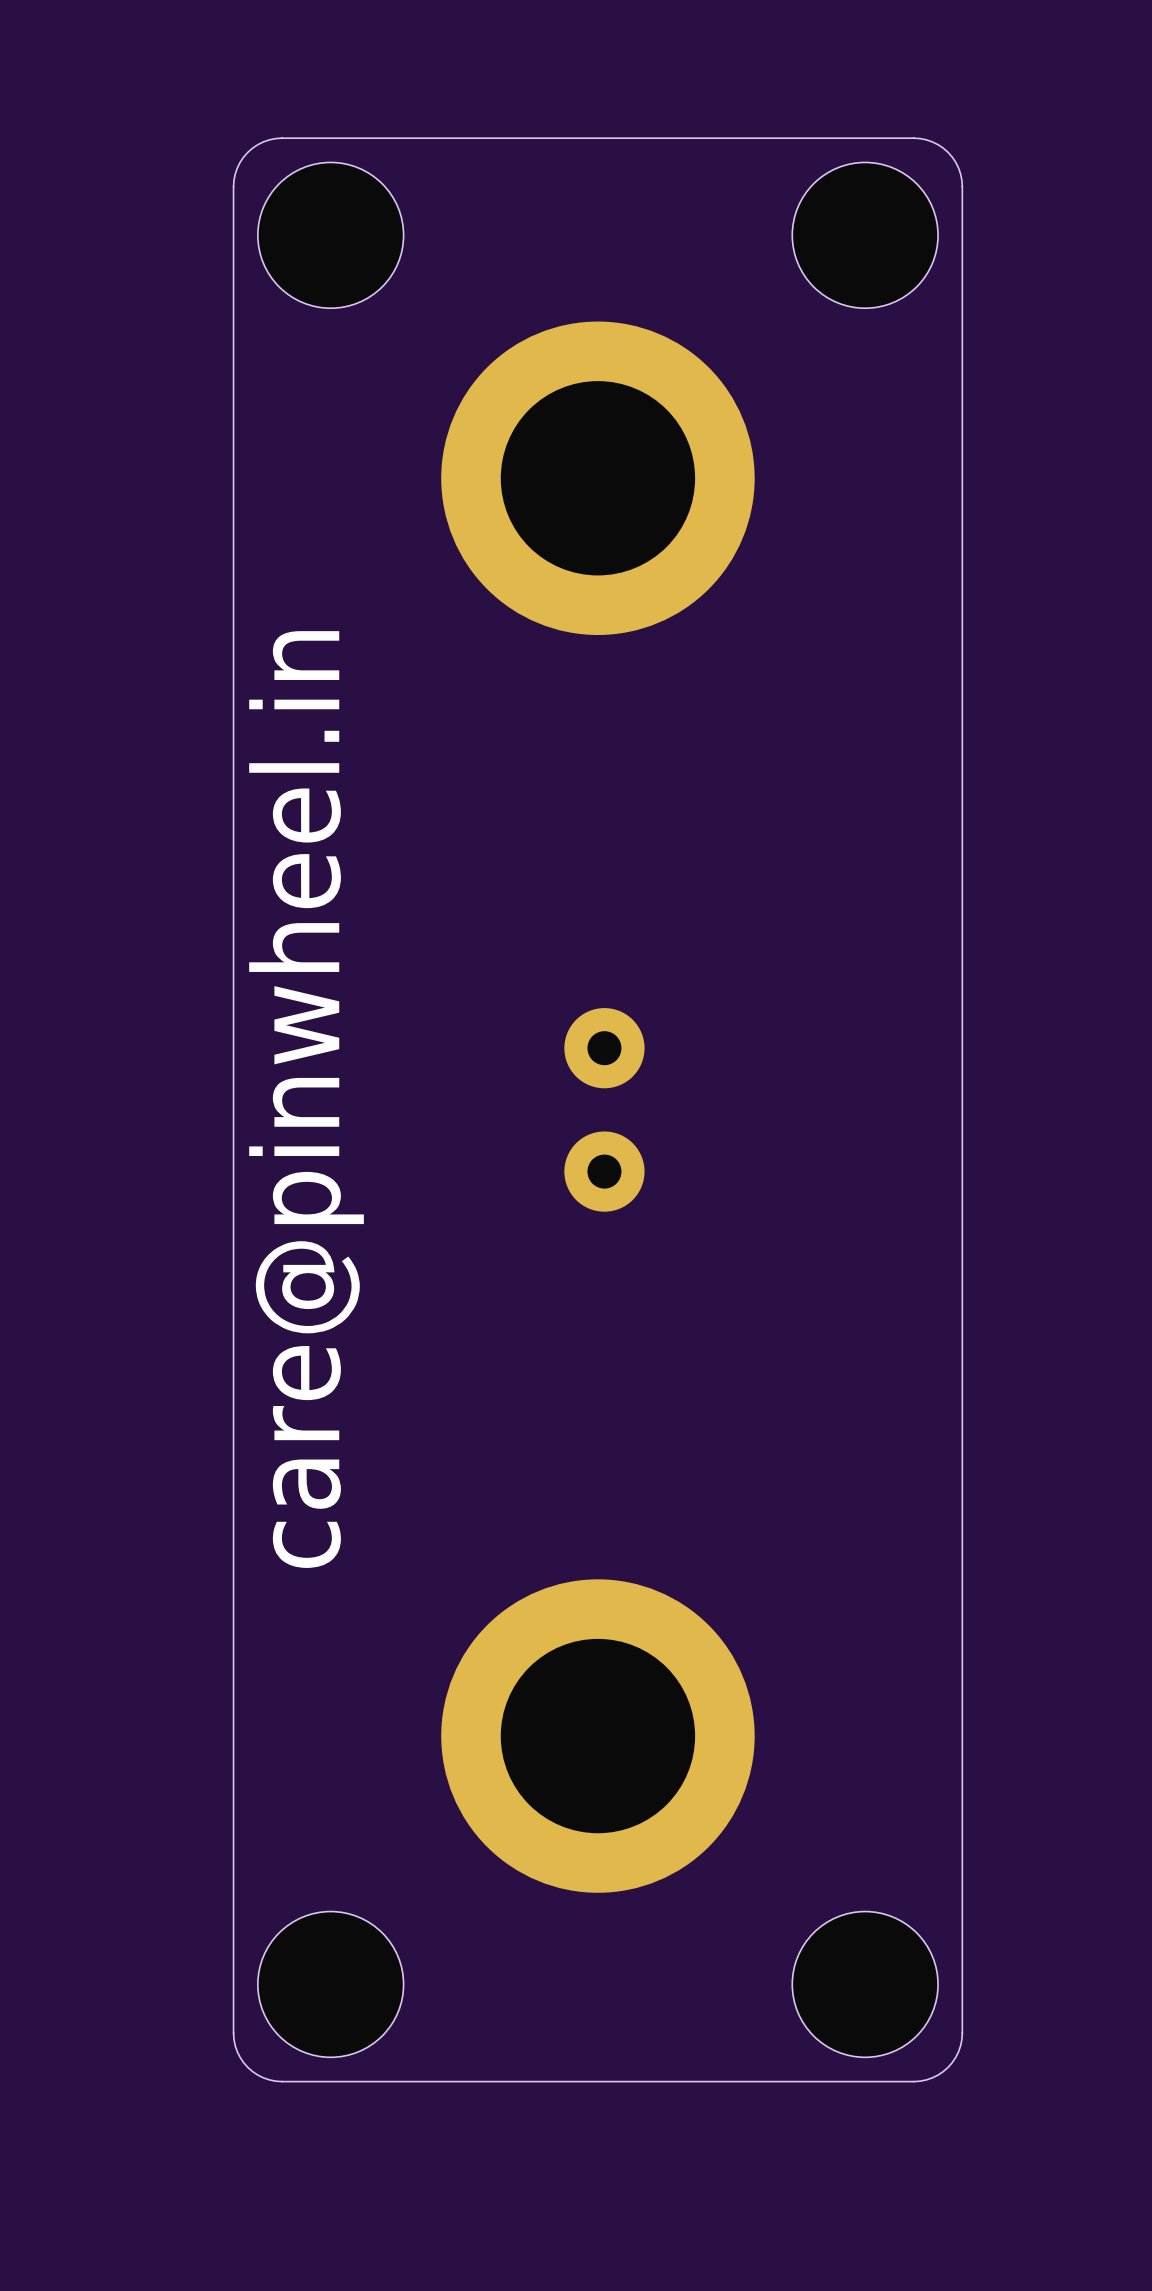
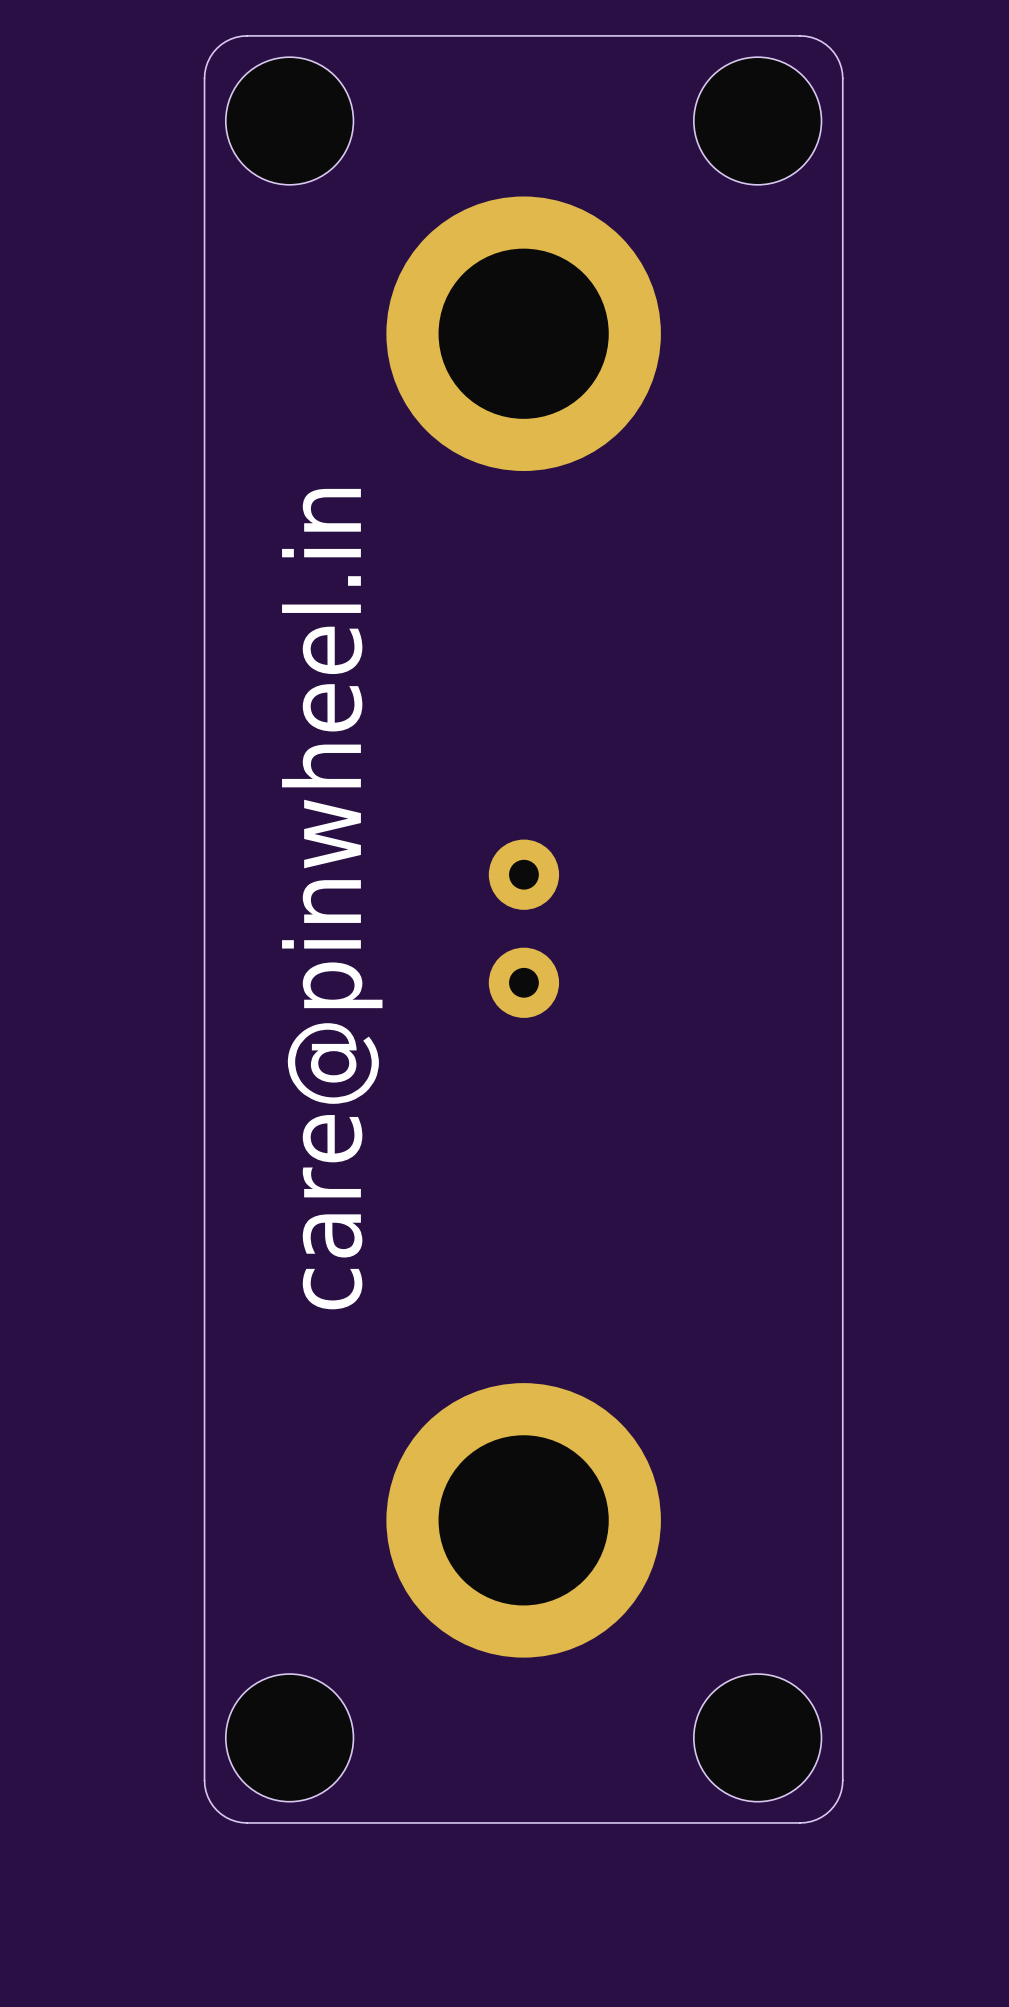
board edge: (962, 186) (958, 168) (948, 152) (932, 141) (913, 138) (275, 138) (257, 144) (243, 157) (237, 168) (233, 186) -> (842, 163) (841, 67) (833, 52) (826, 44) (816, 39) (800, 35) (236, 37) (216, 48) (205, 67) (204, 163)
hole position: (330, 235) -> (289, 121)
hole position: (865, 235) -> (757, 121)
part position: (597, 478) -> (523, 333)
text position: care@pinwheel.in (306, 1099) -> care@pinwheel.in (332, 899)
part position: (604, 1109) -> (523, 928)

